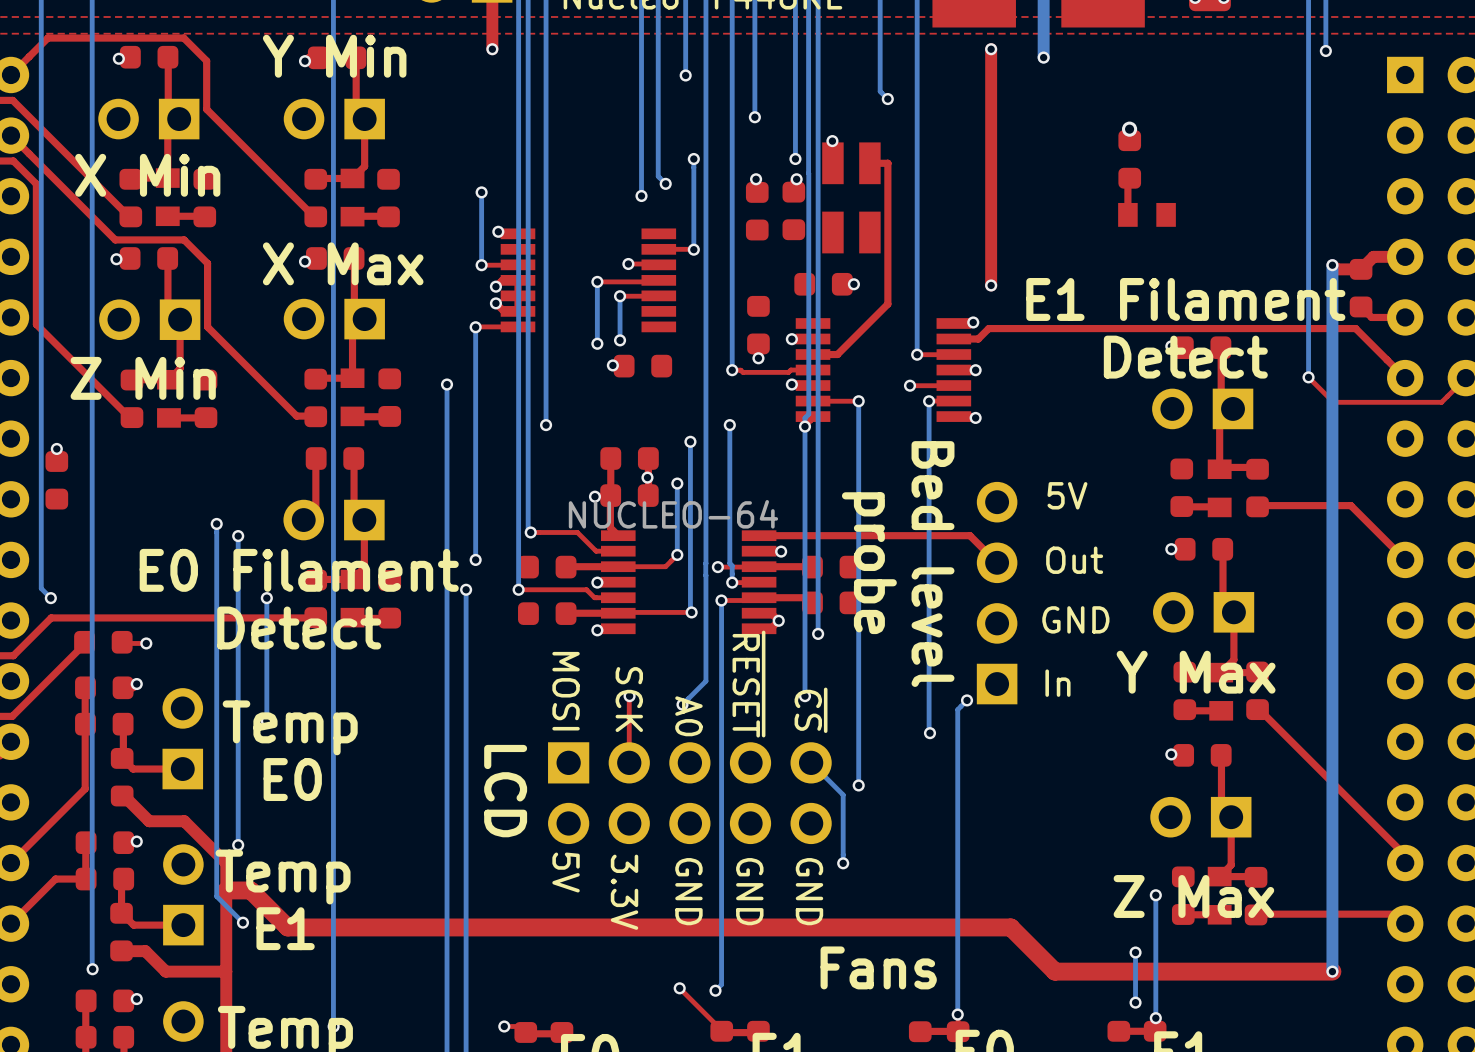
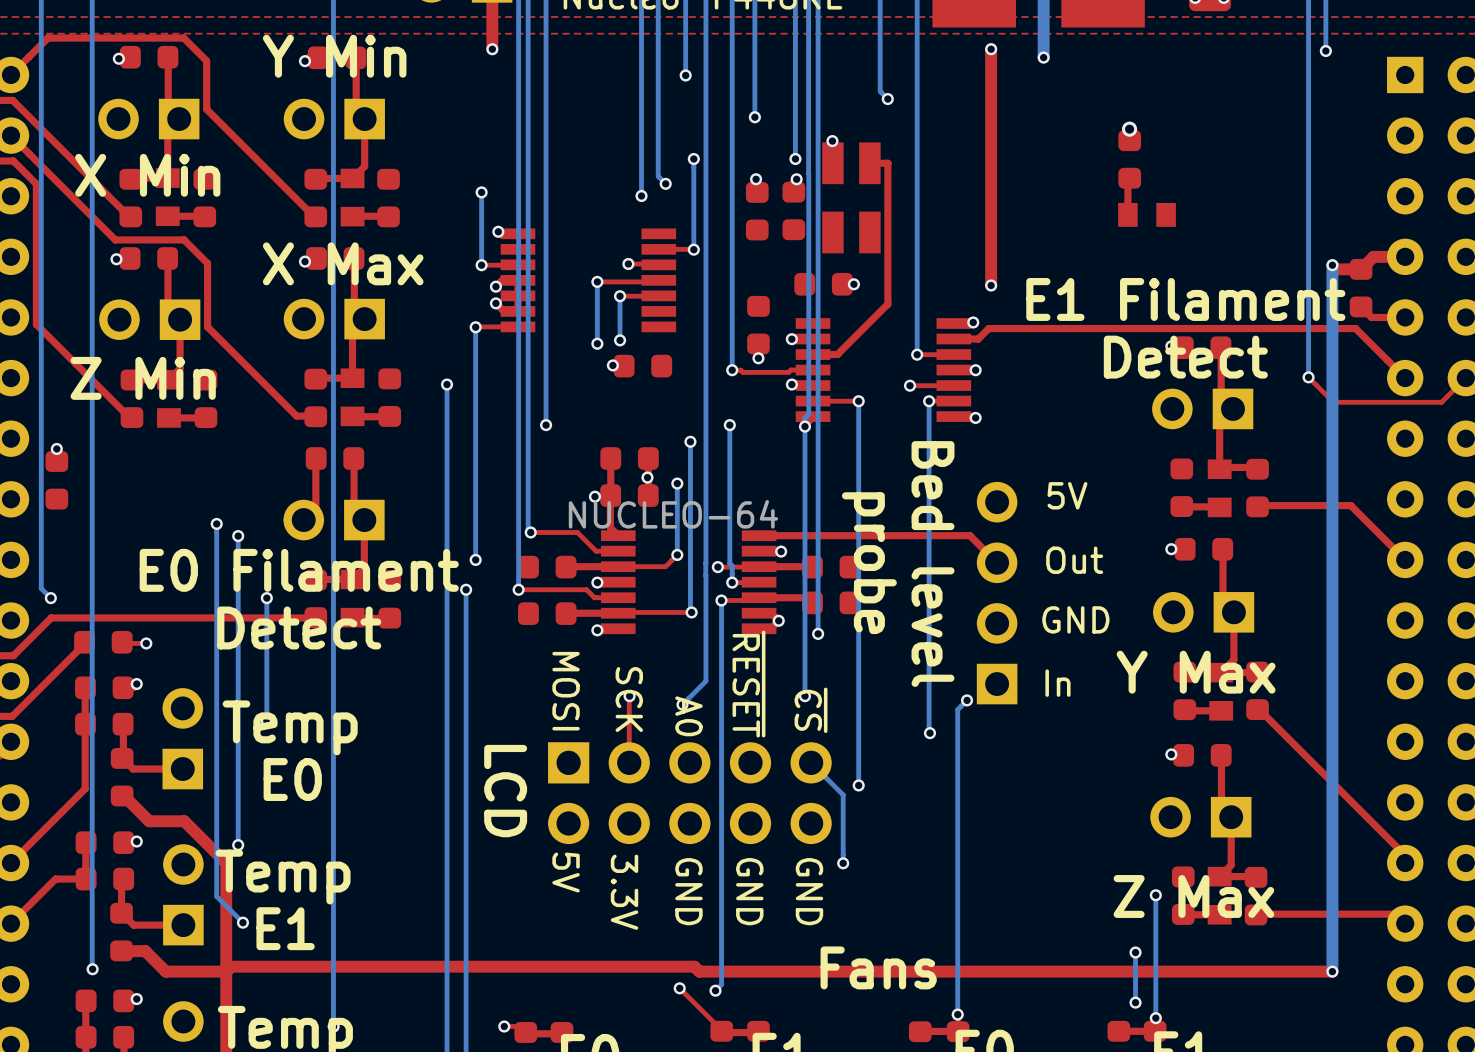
top track: (226, 890) (250, 890) (287, 927) (1010, 927) (1054, 971) -> (226, 971) (231, 966) (694, 966) (699, 971) (1054, 971)
top track width: thick (1332, 971) (1054, 971) -> thin (1332, 971) (1054, 971)

